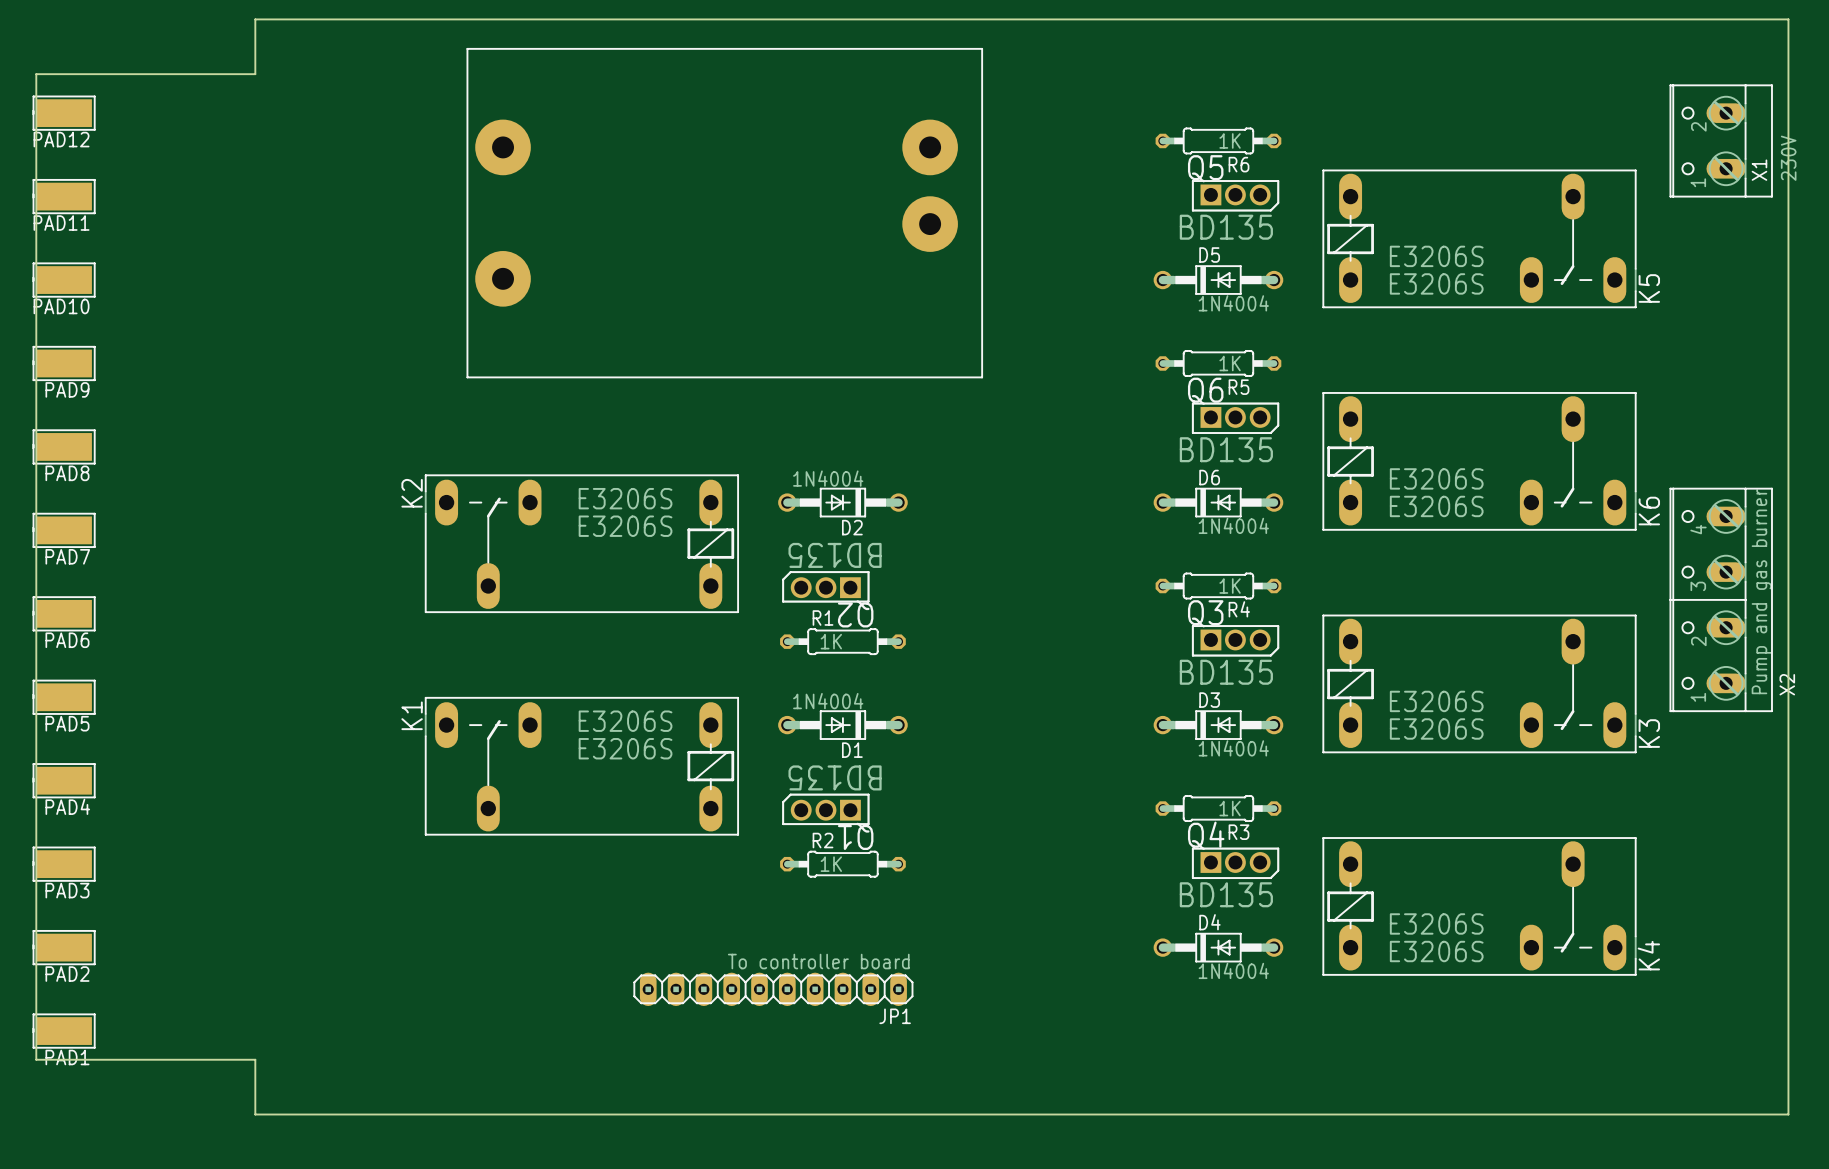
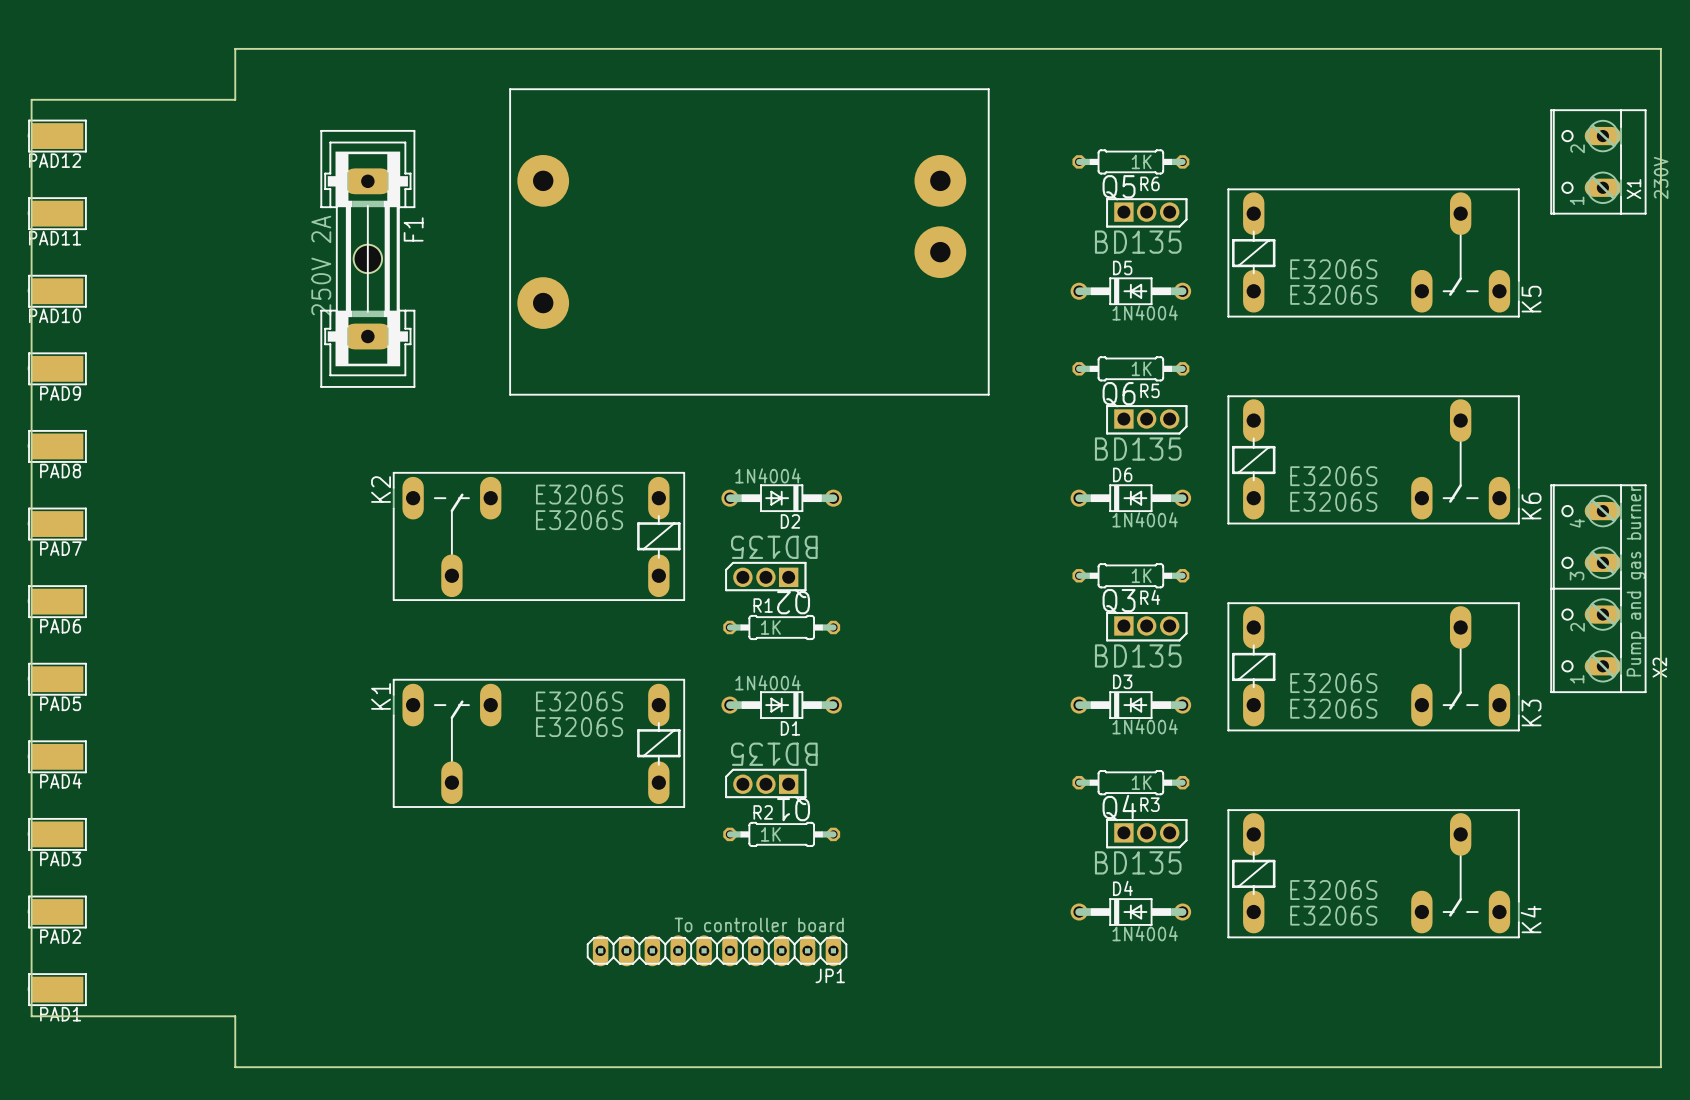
part position: (724, 213) -> (749, 241)
F1: none -> 250V 2A (367, 258)

